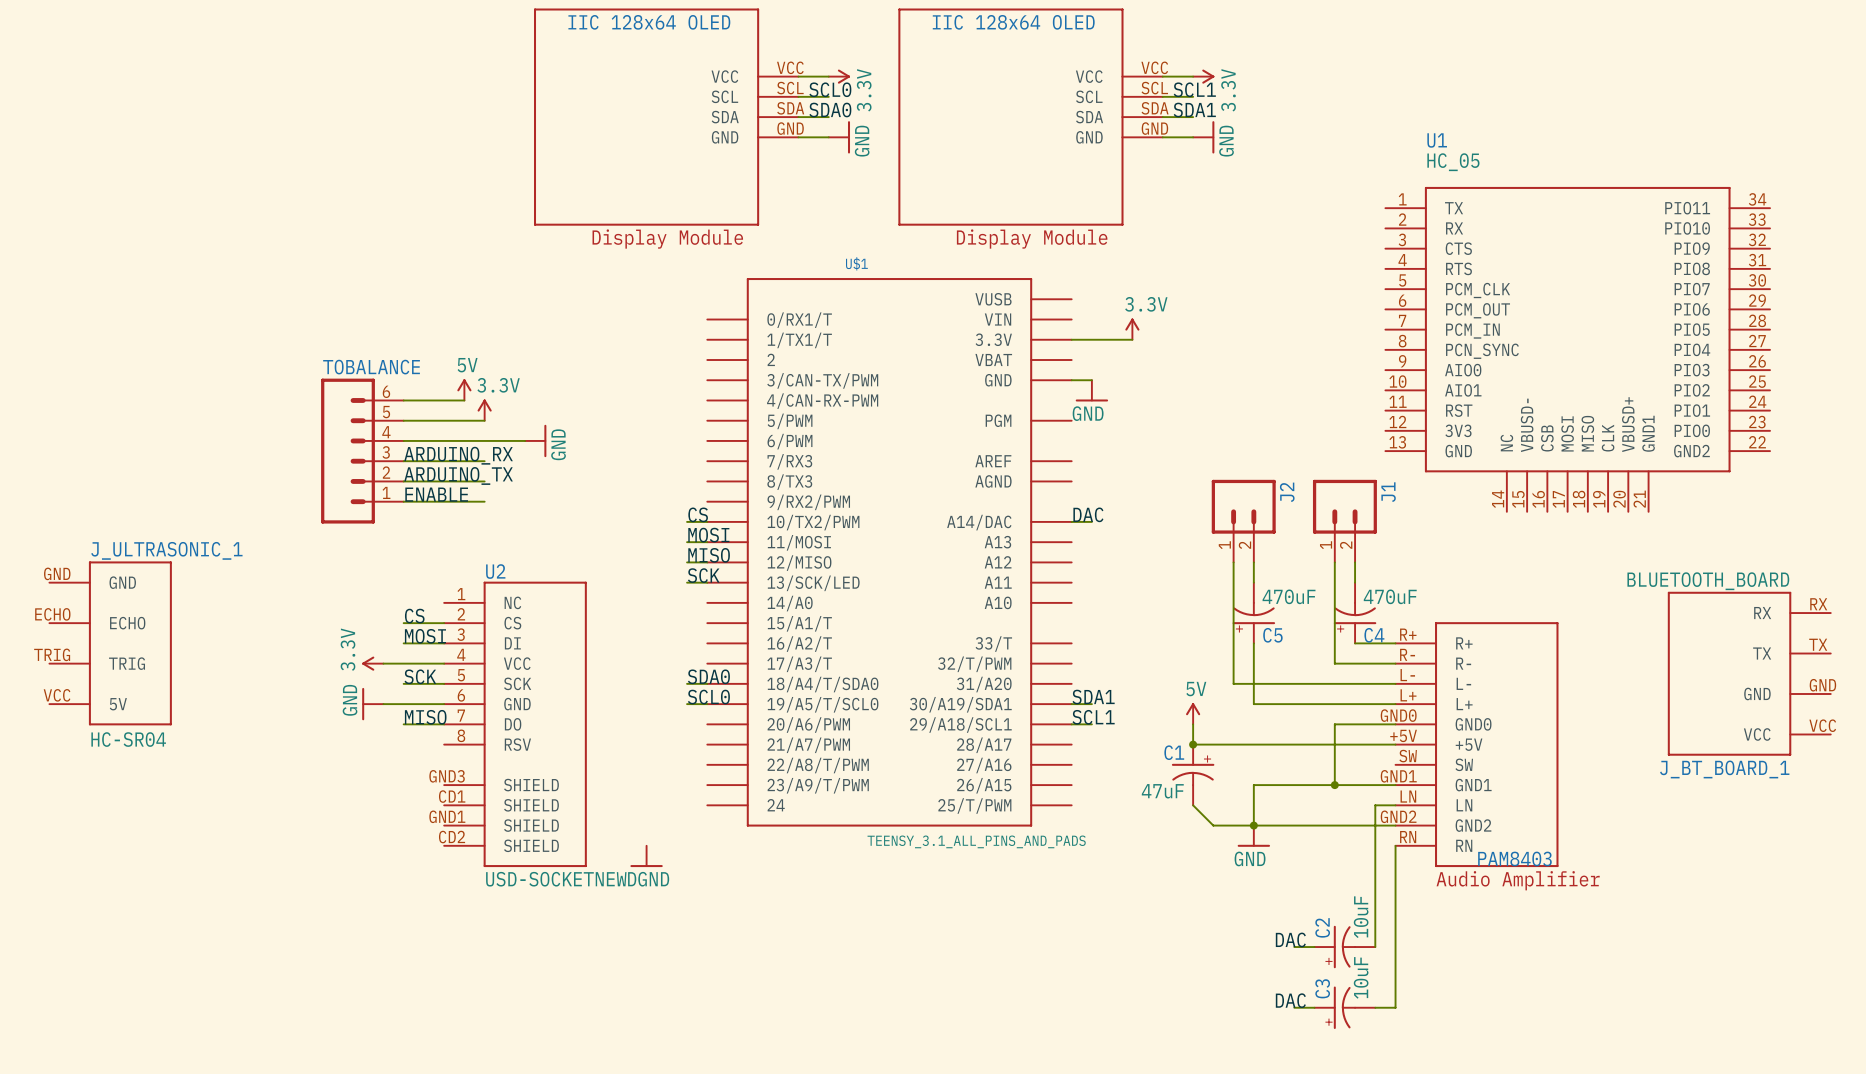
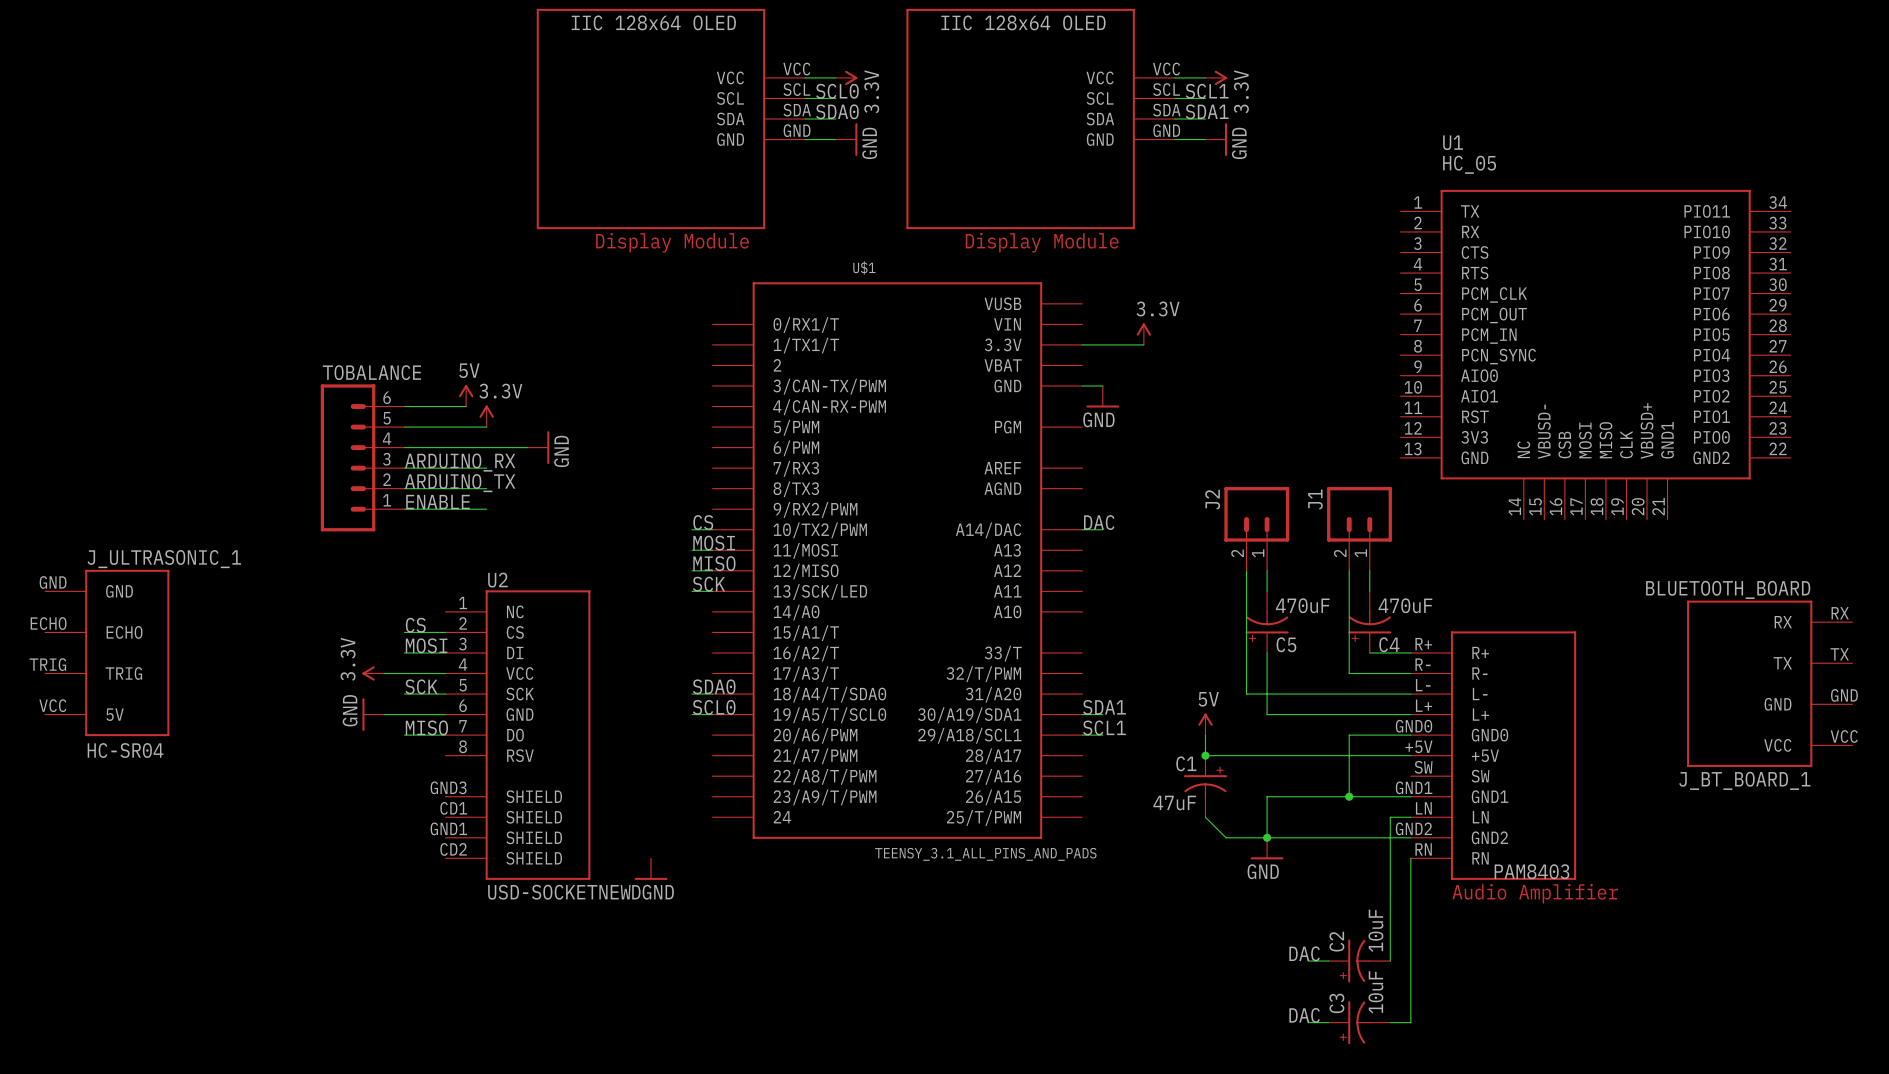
J2 flip: as is (1243, 506) -> left-right (1256, 514)
J1 flip: as is (1344, 506) -> left-right (1359, 514)

